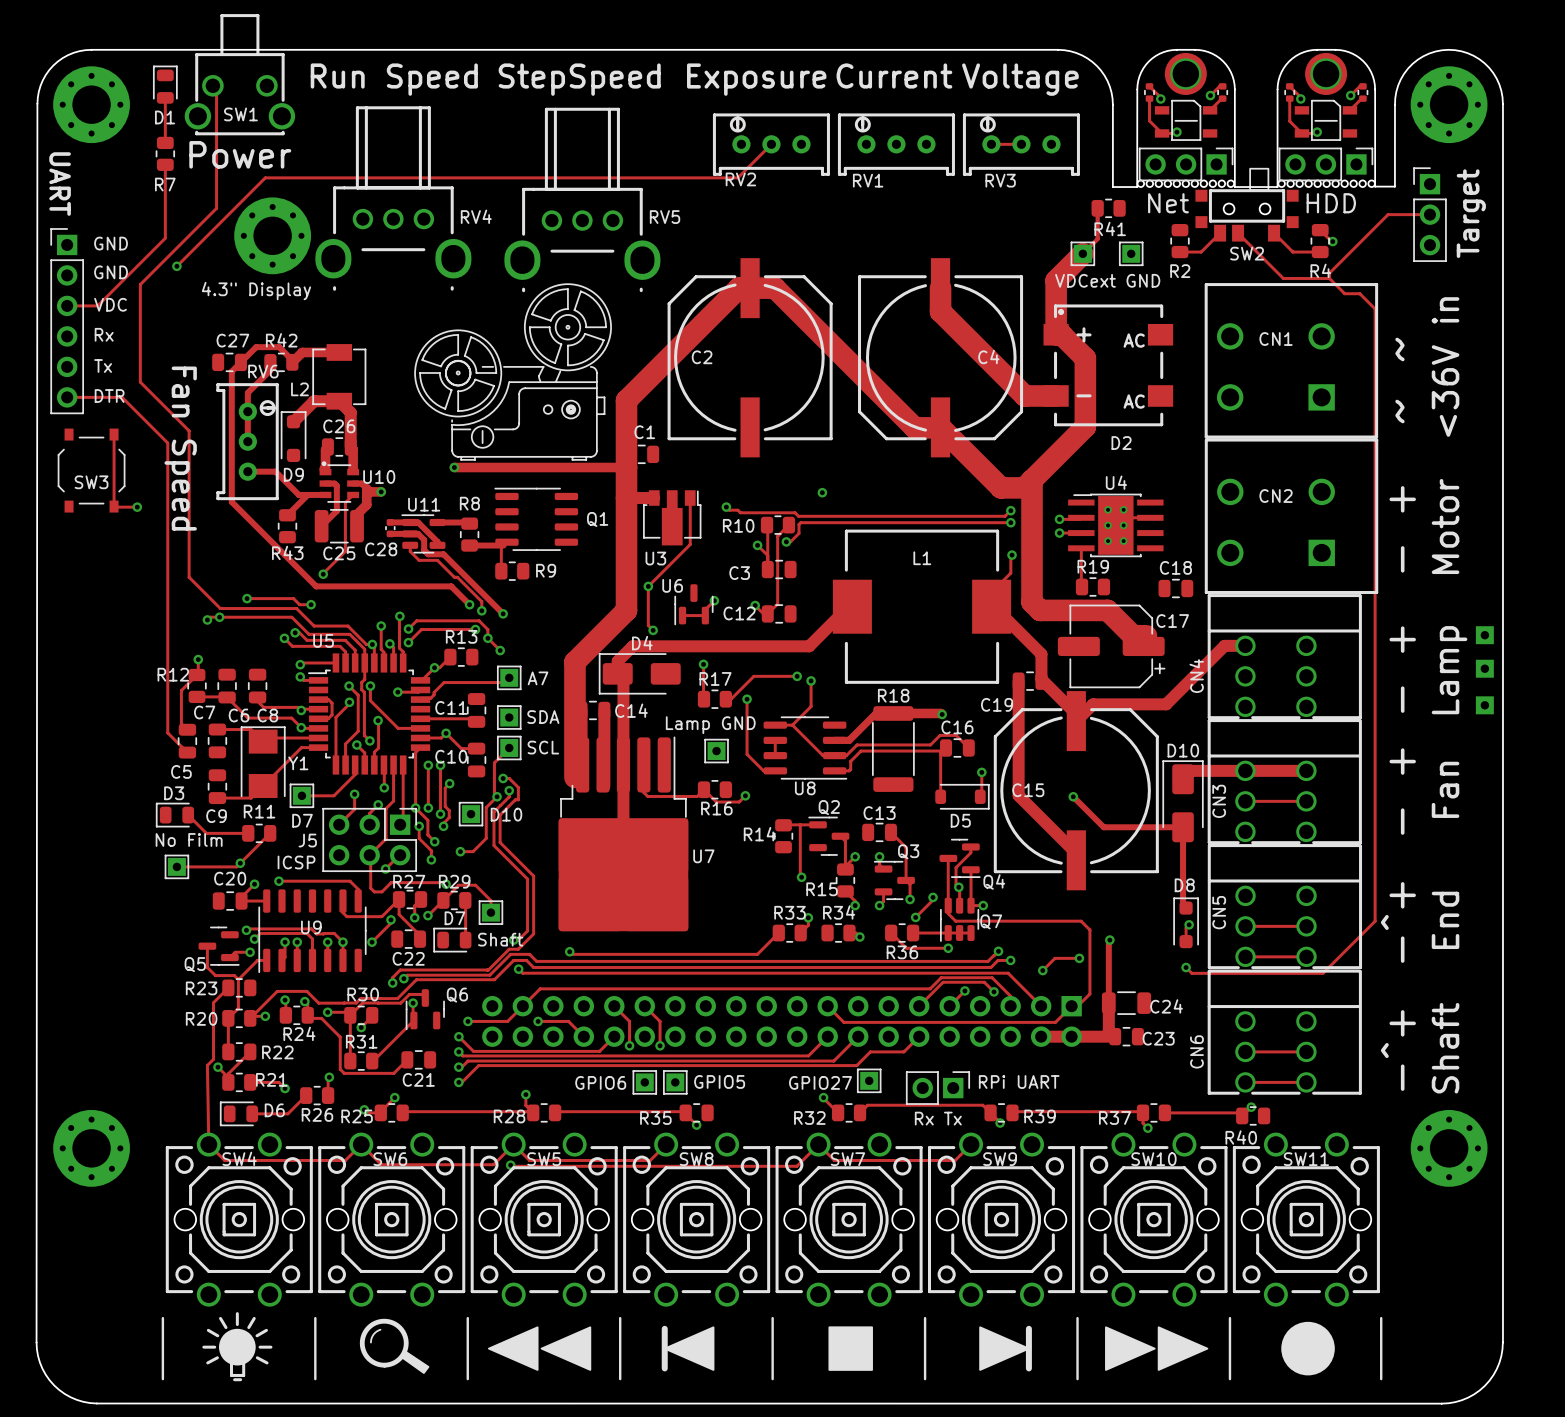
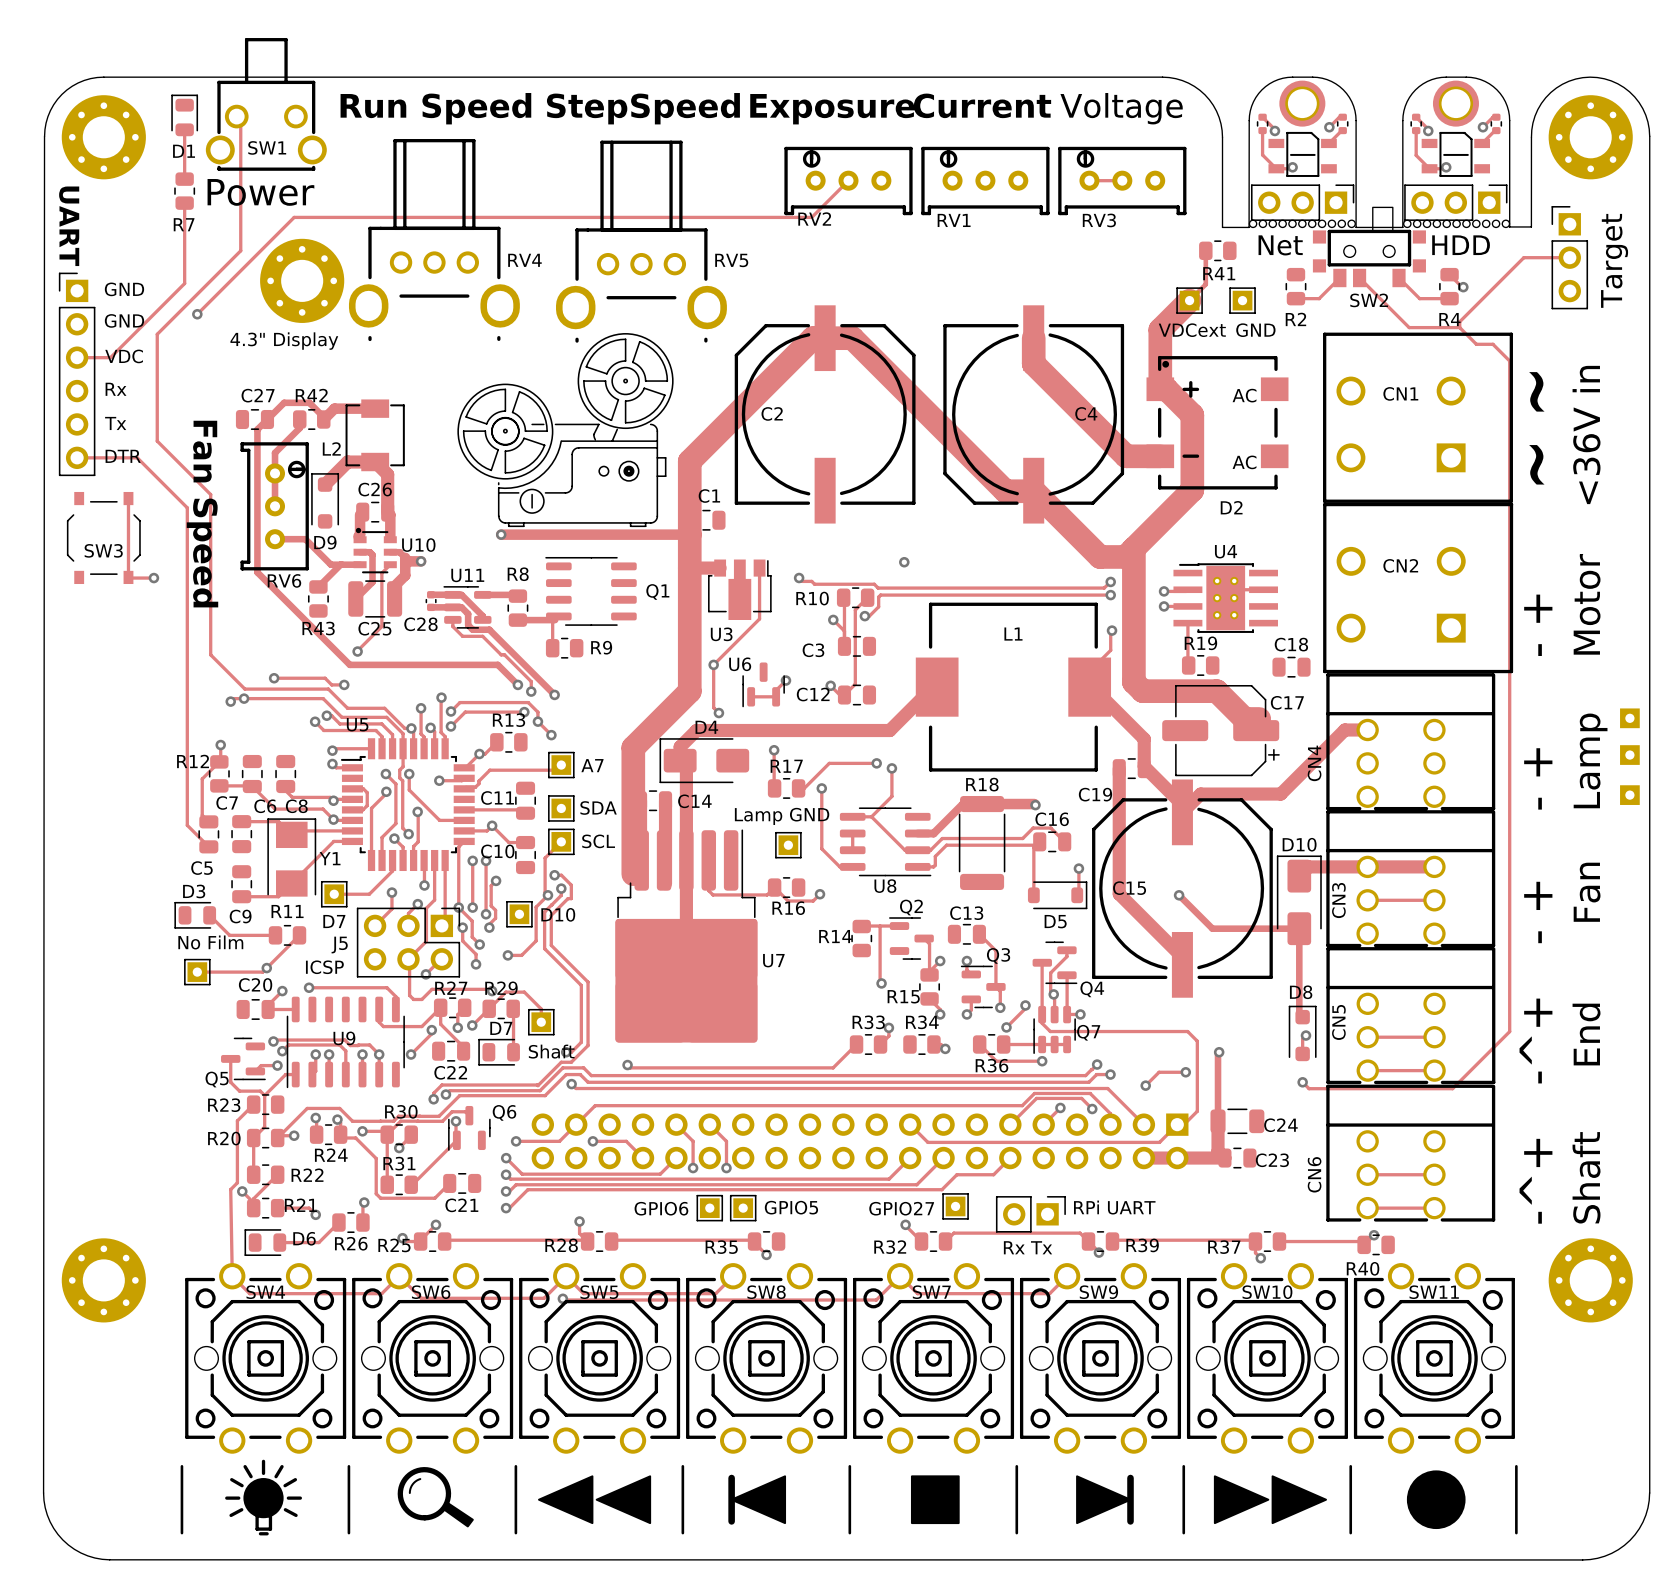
RV6 name position: RV6 (263, 371) -> RV6 (284, 580)

